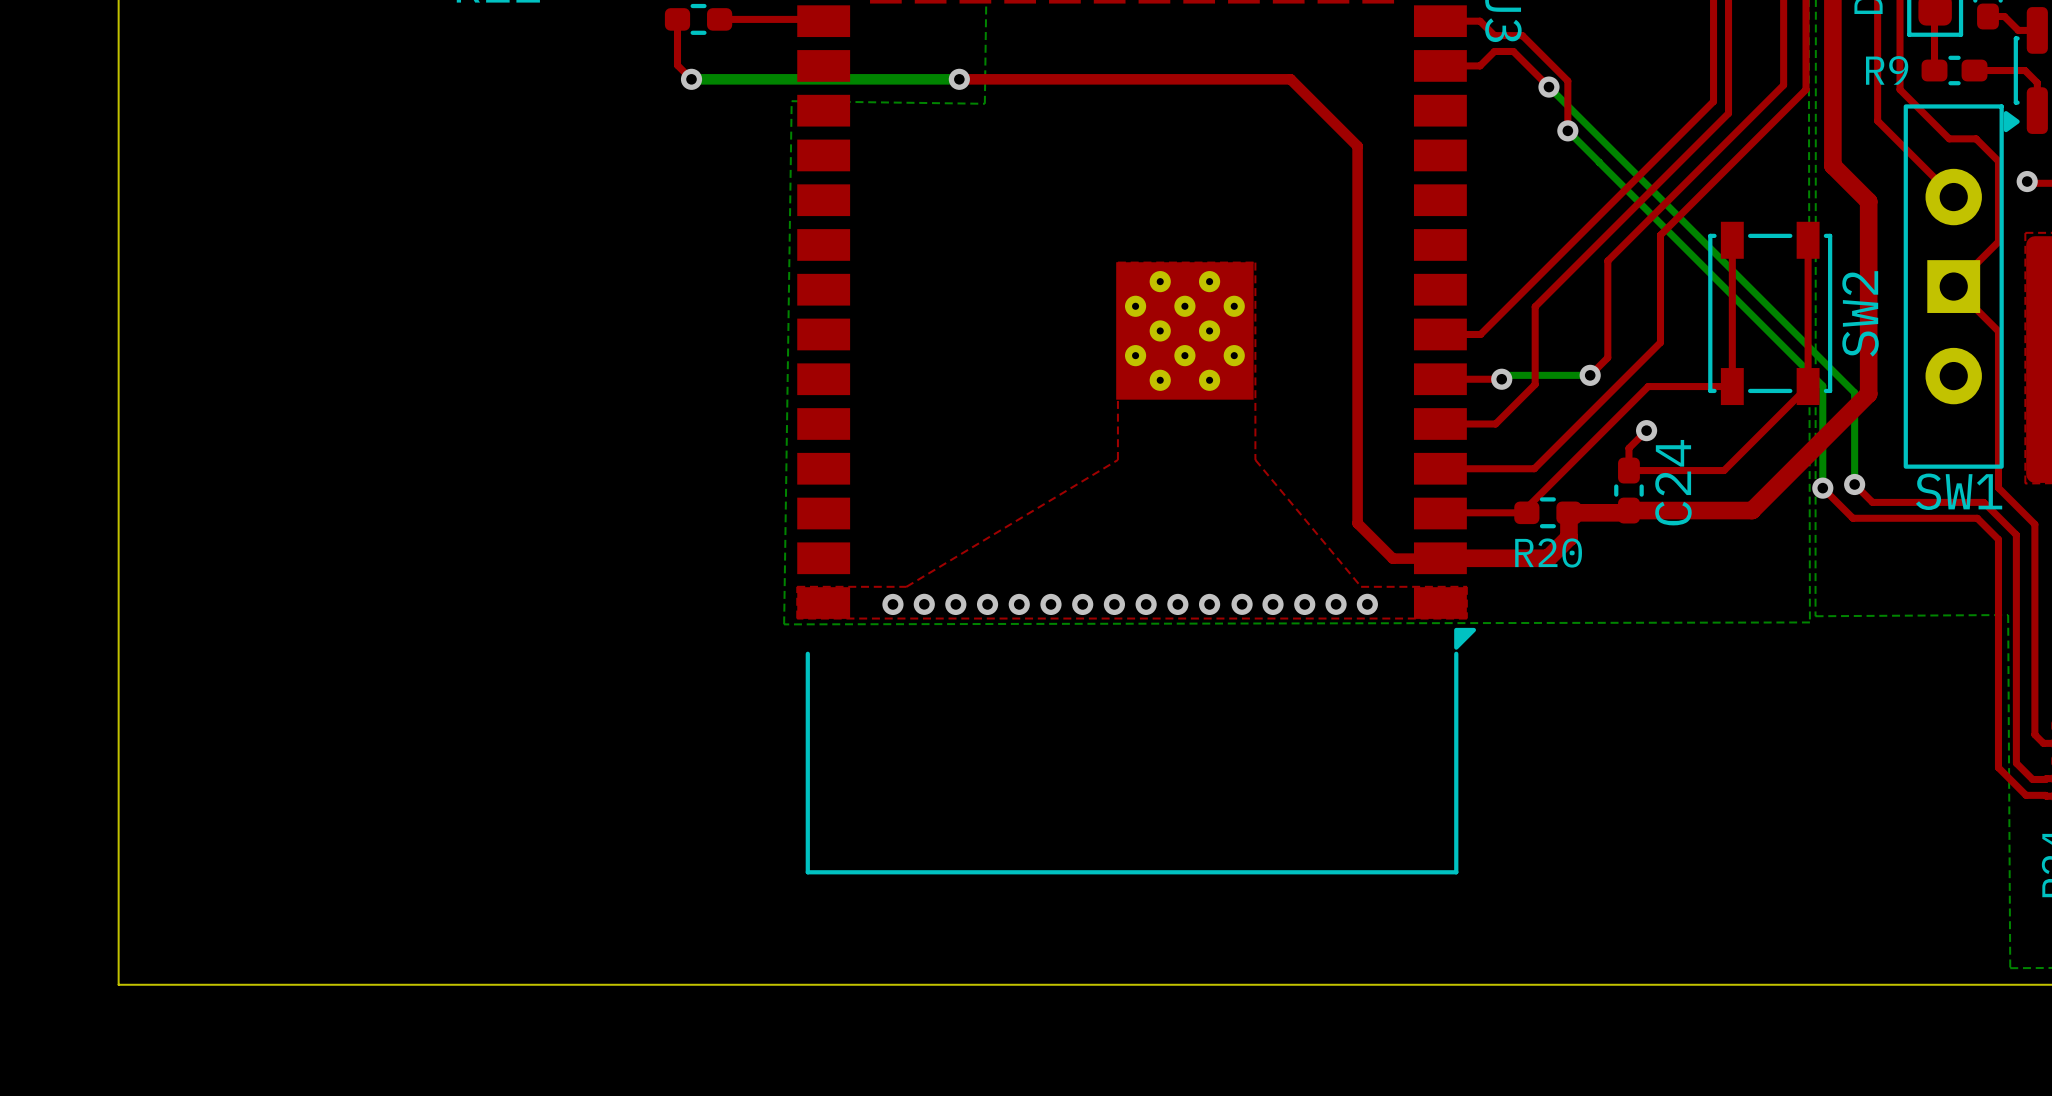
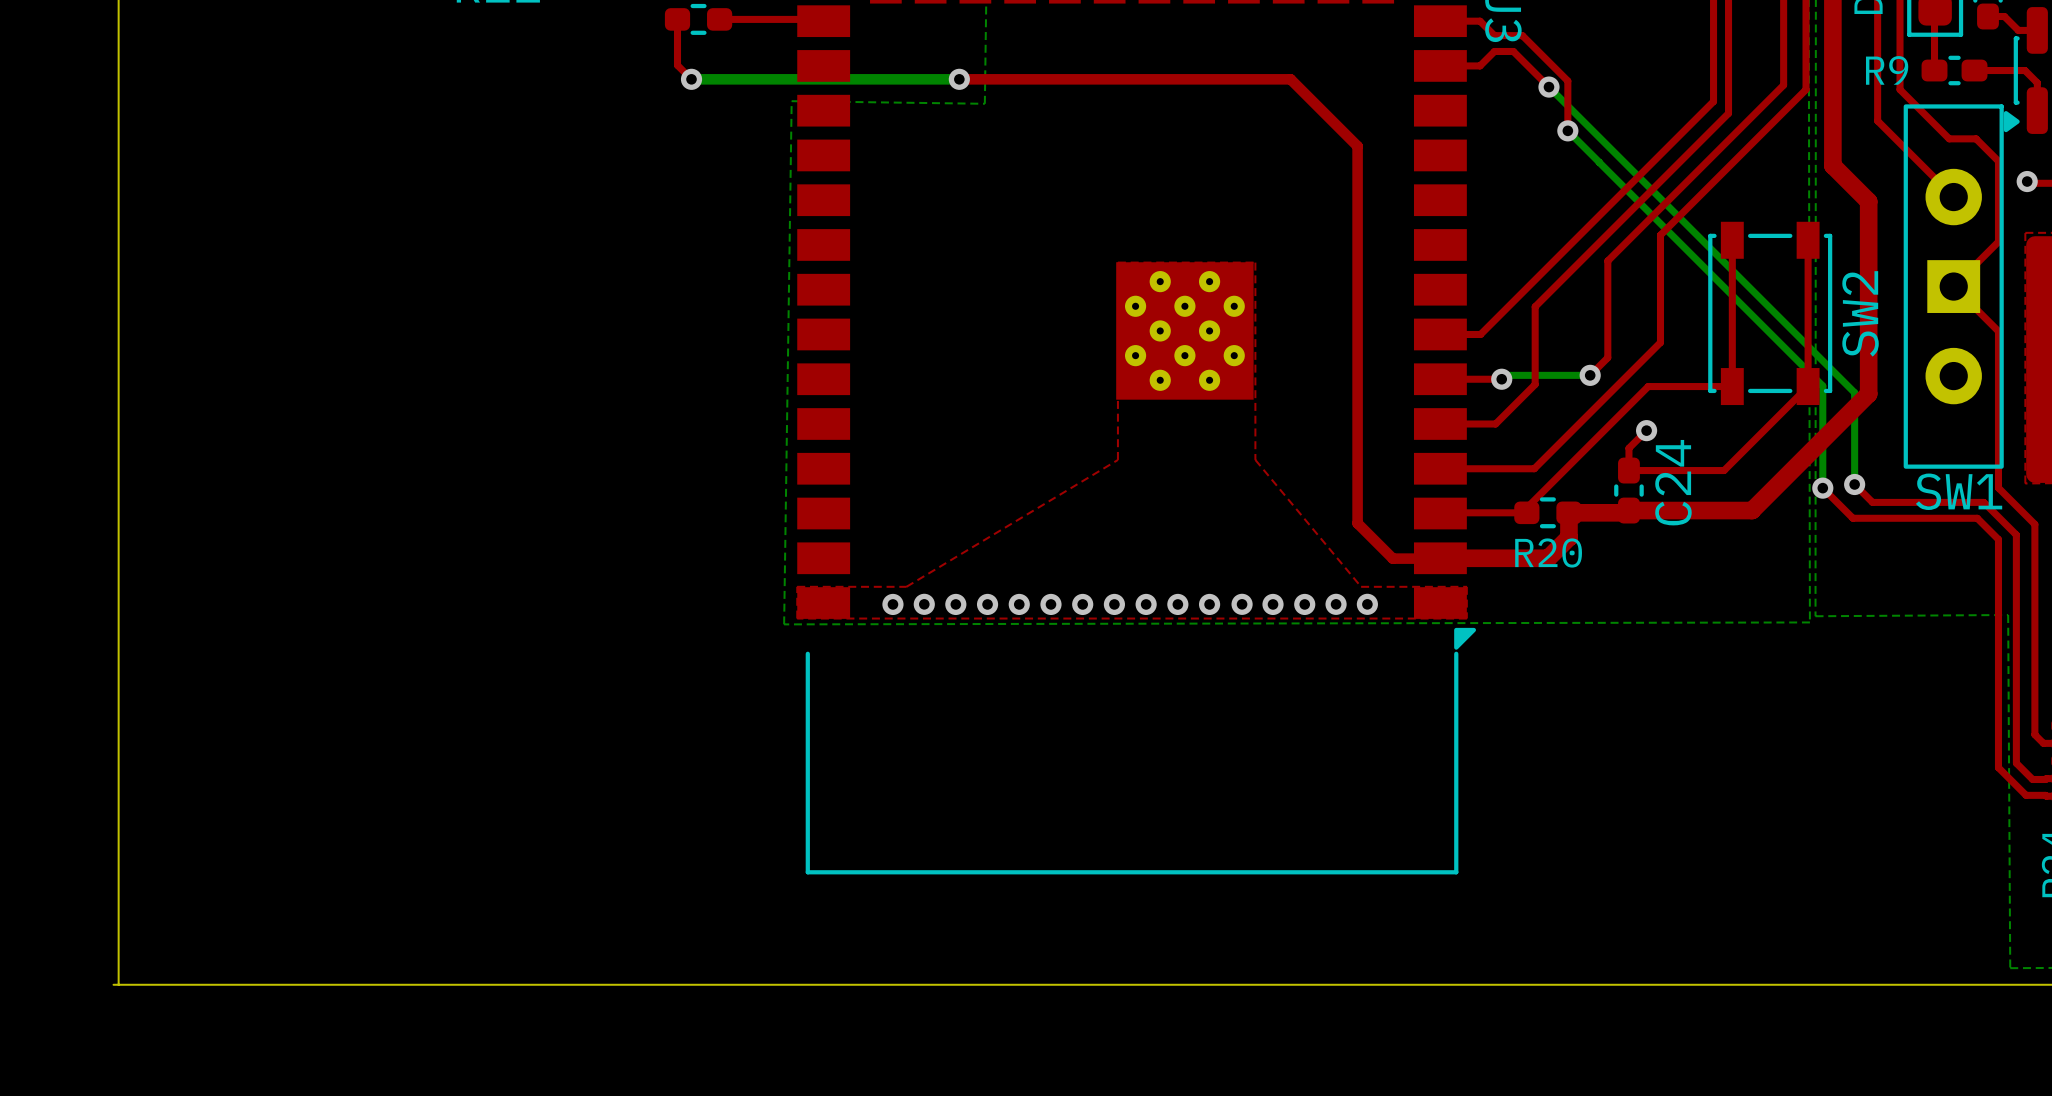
board edge: none -> (113, 984) (118, 984)

